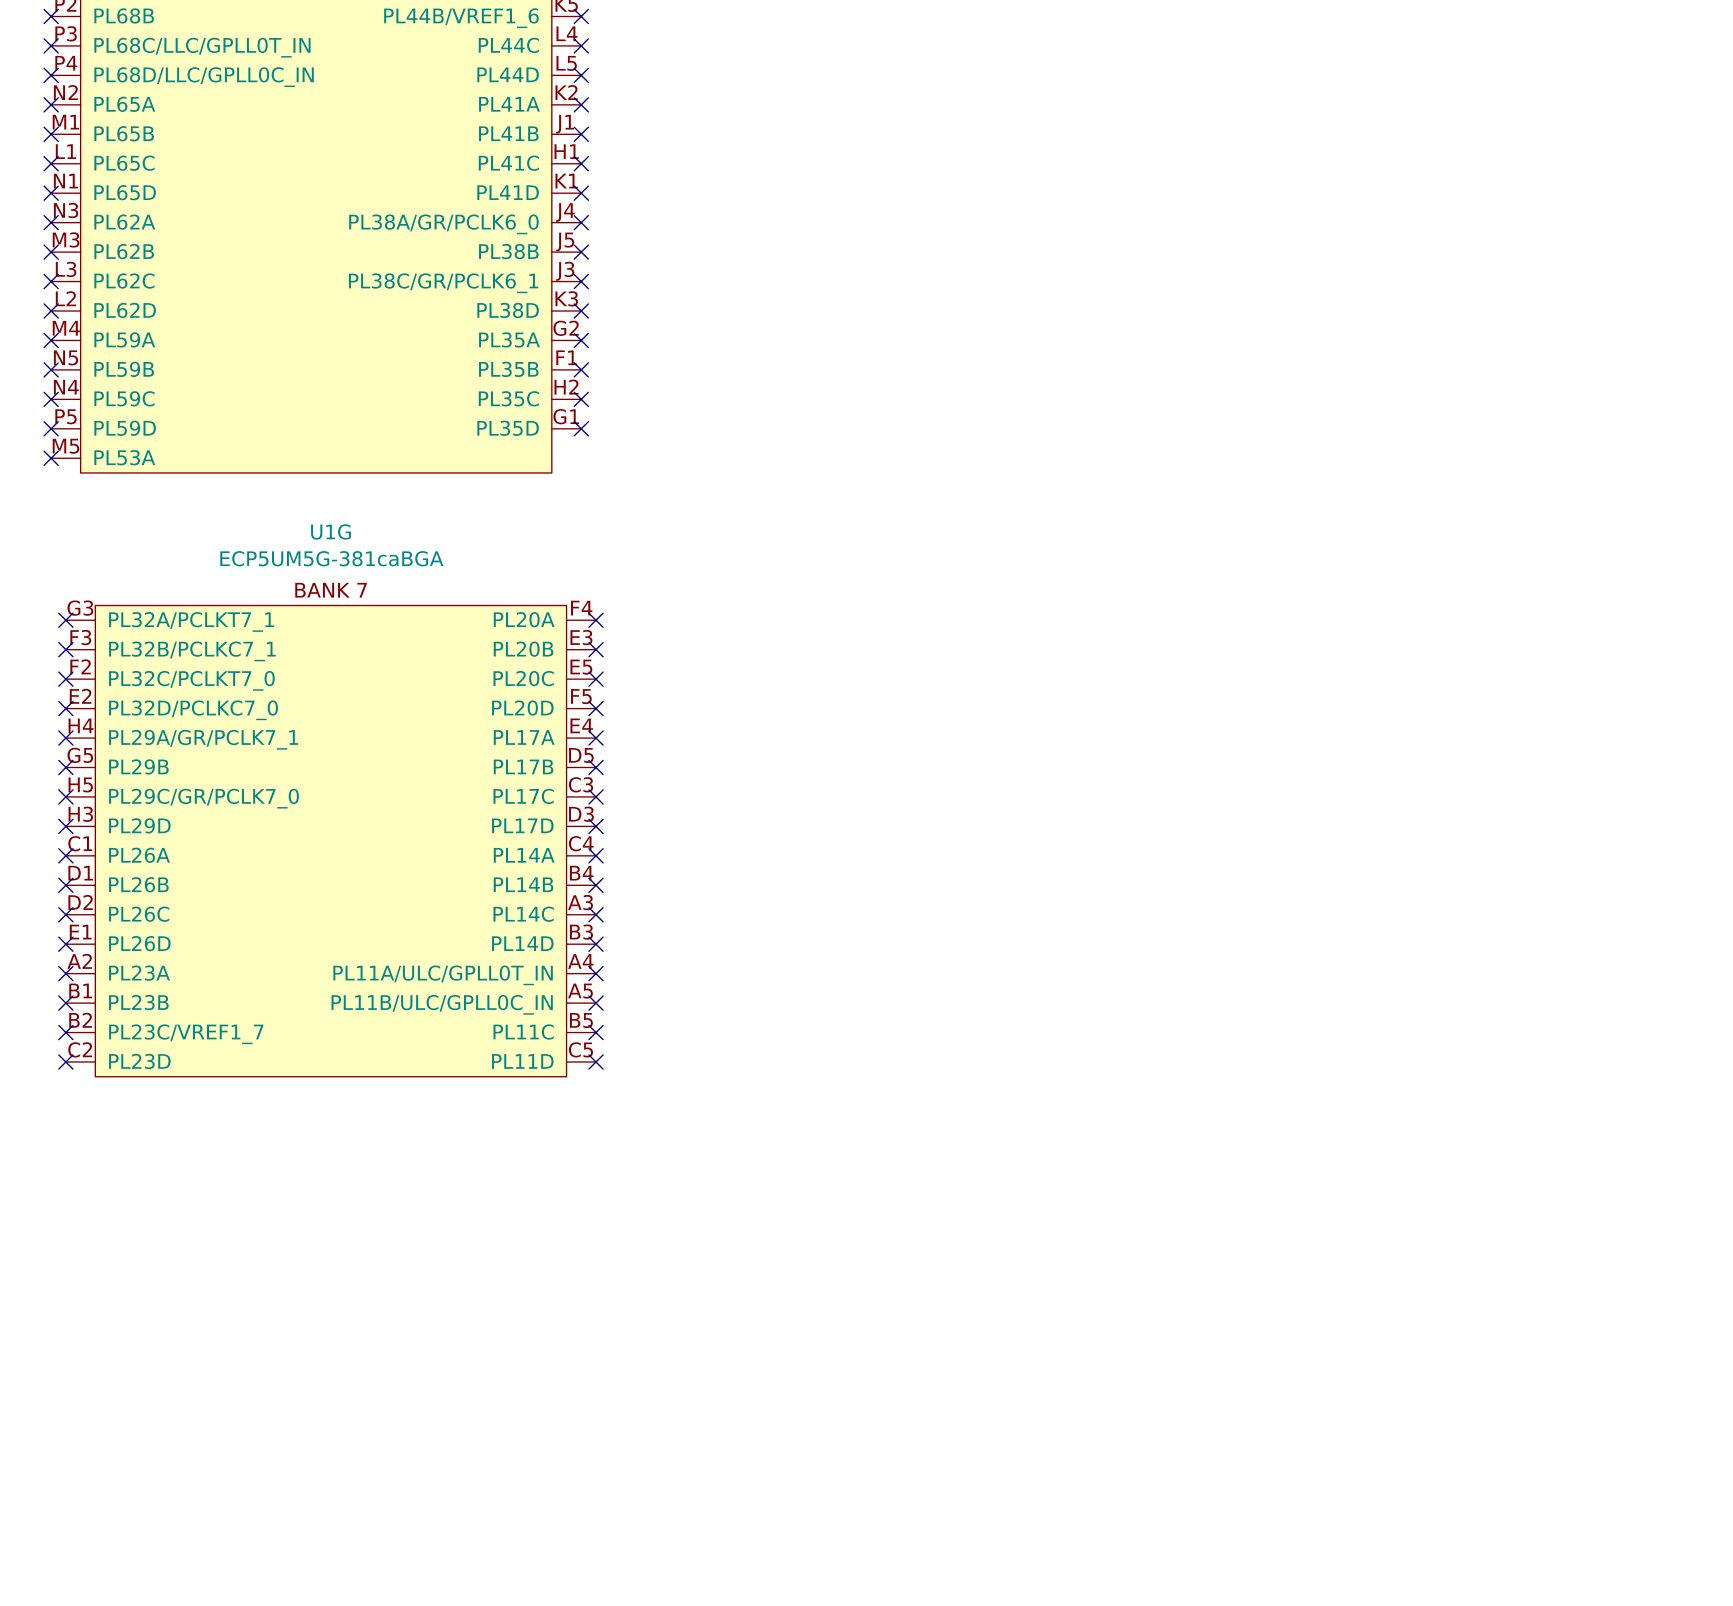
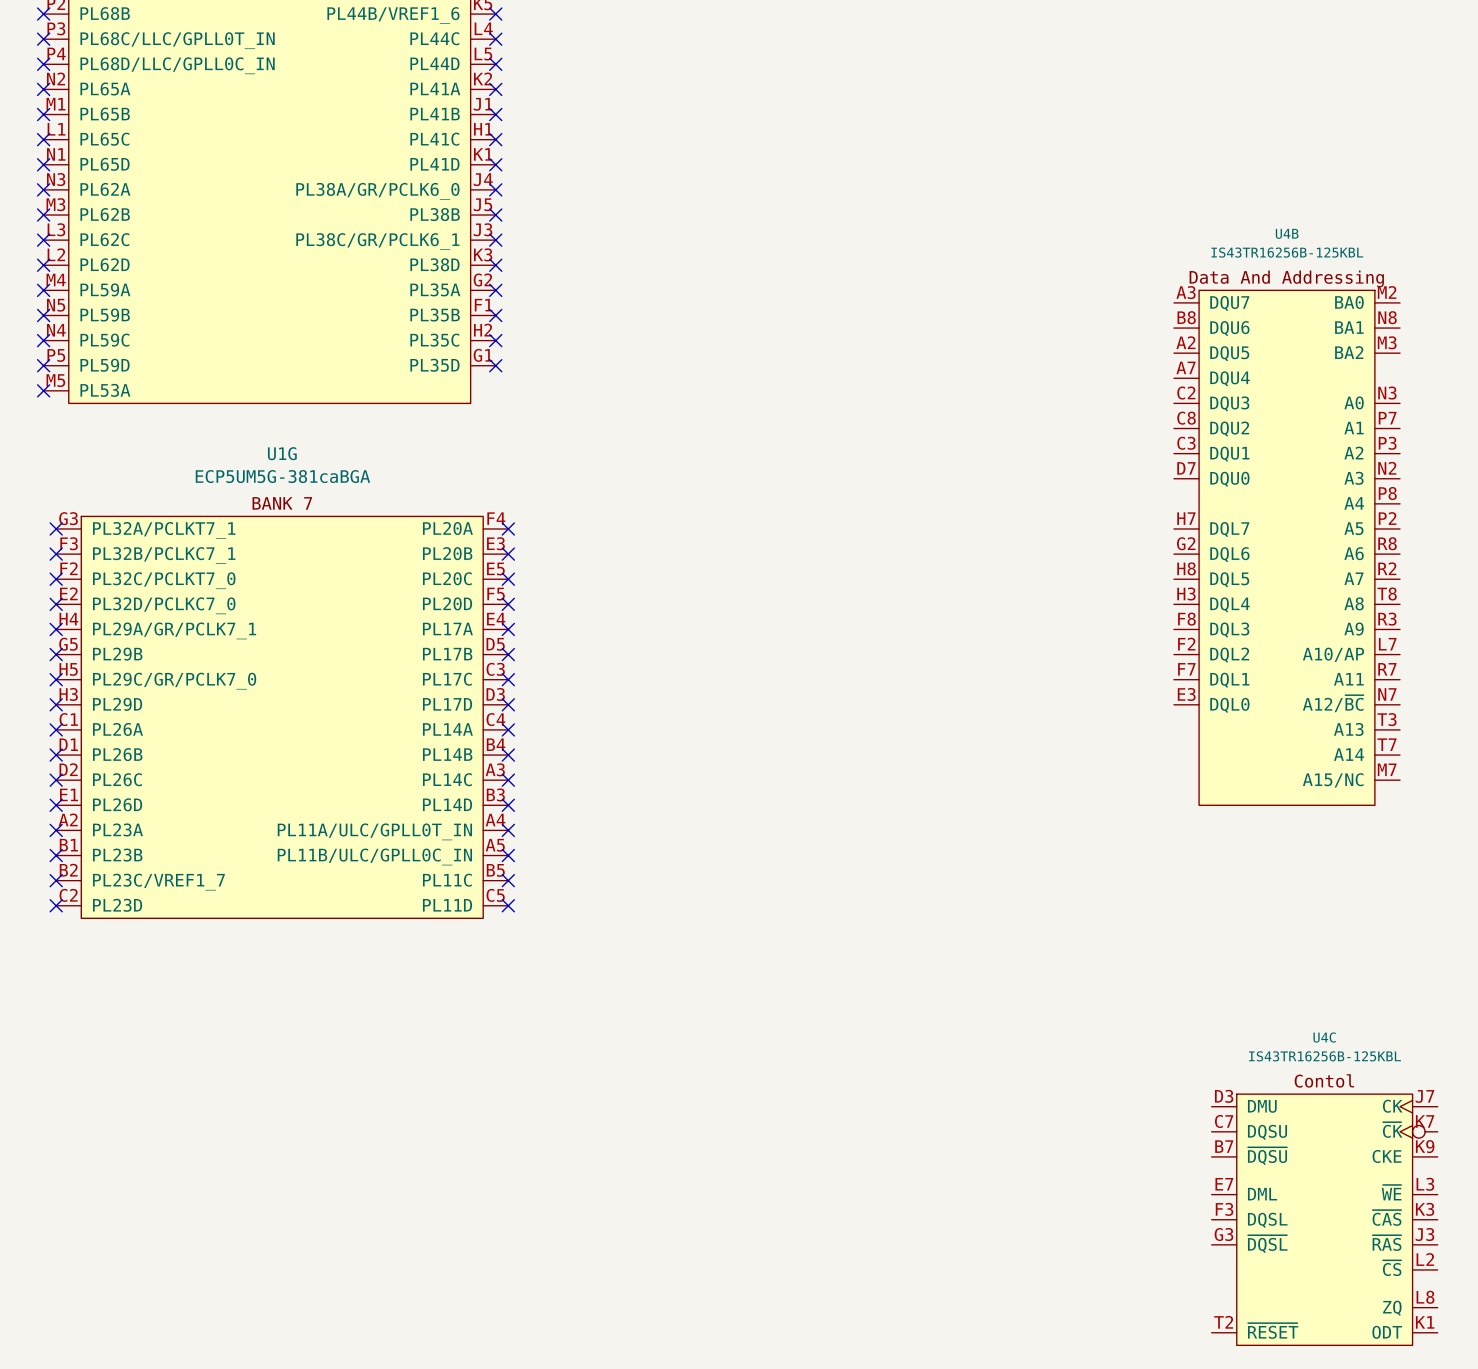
U4B: none -> IS43TR16256B-125KBL (1286, 547)
U4C: none -> IS43TR16256B-125KBL (1324, 1219)

